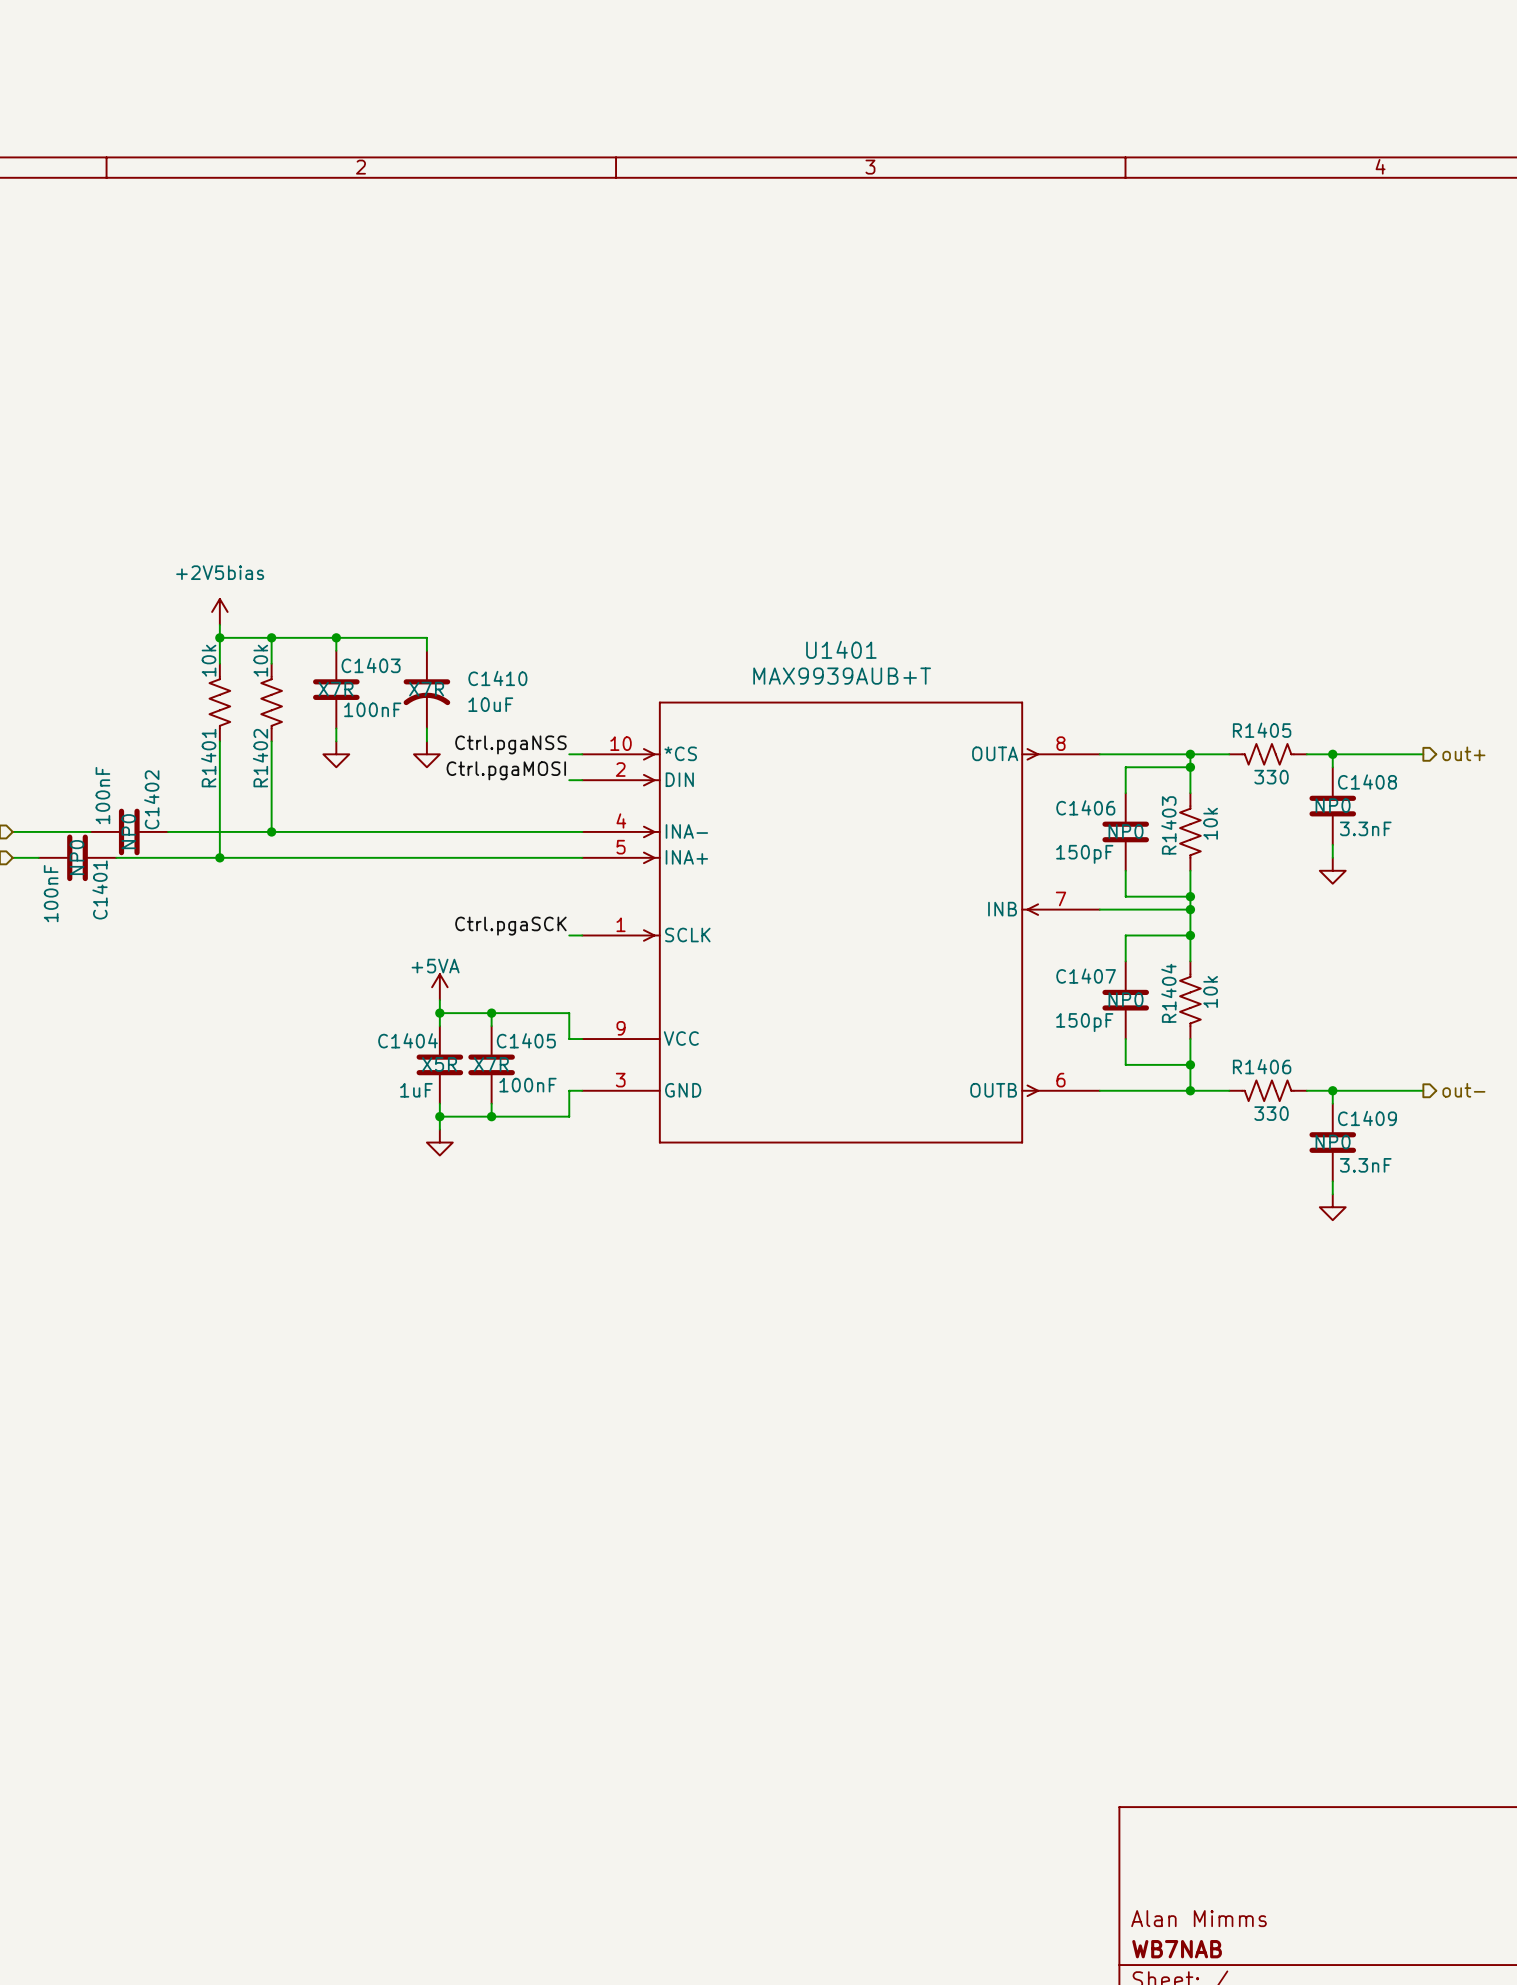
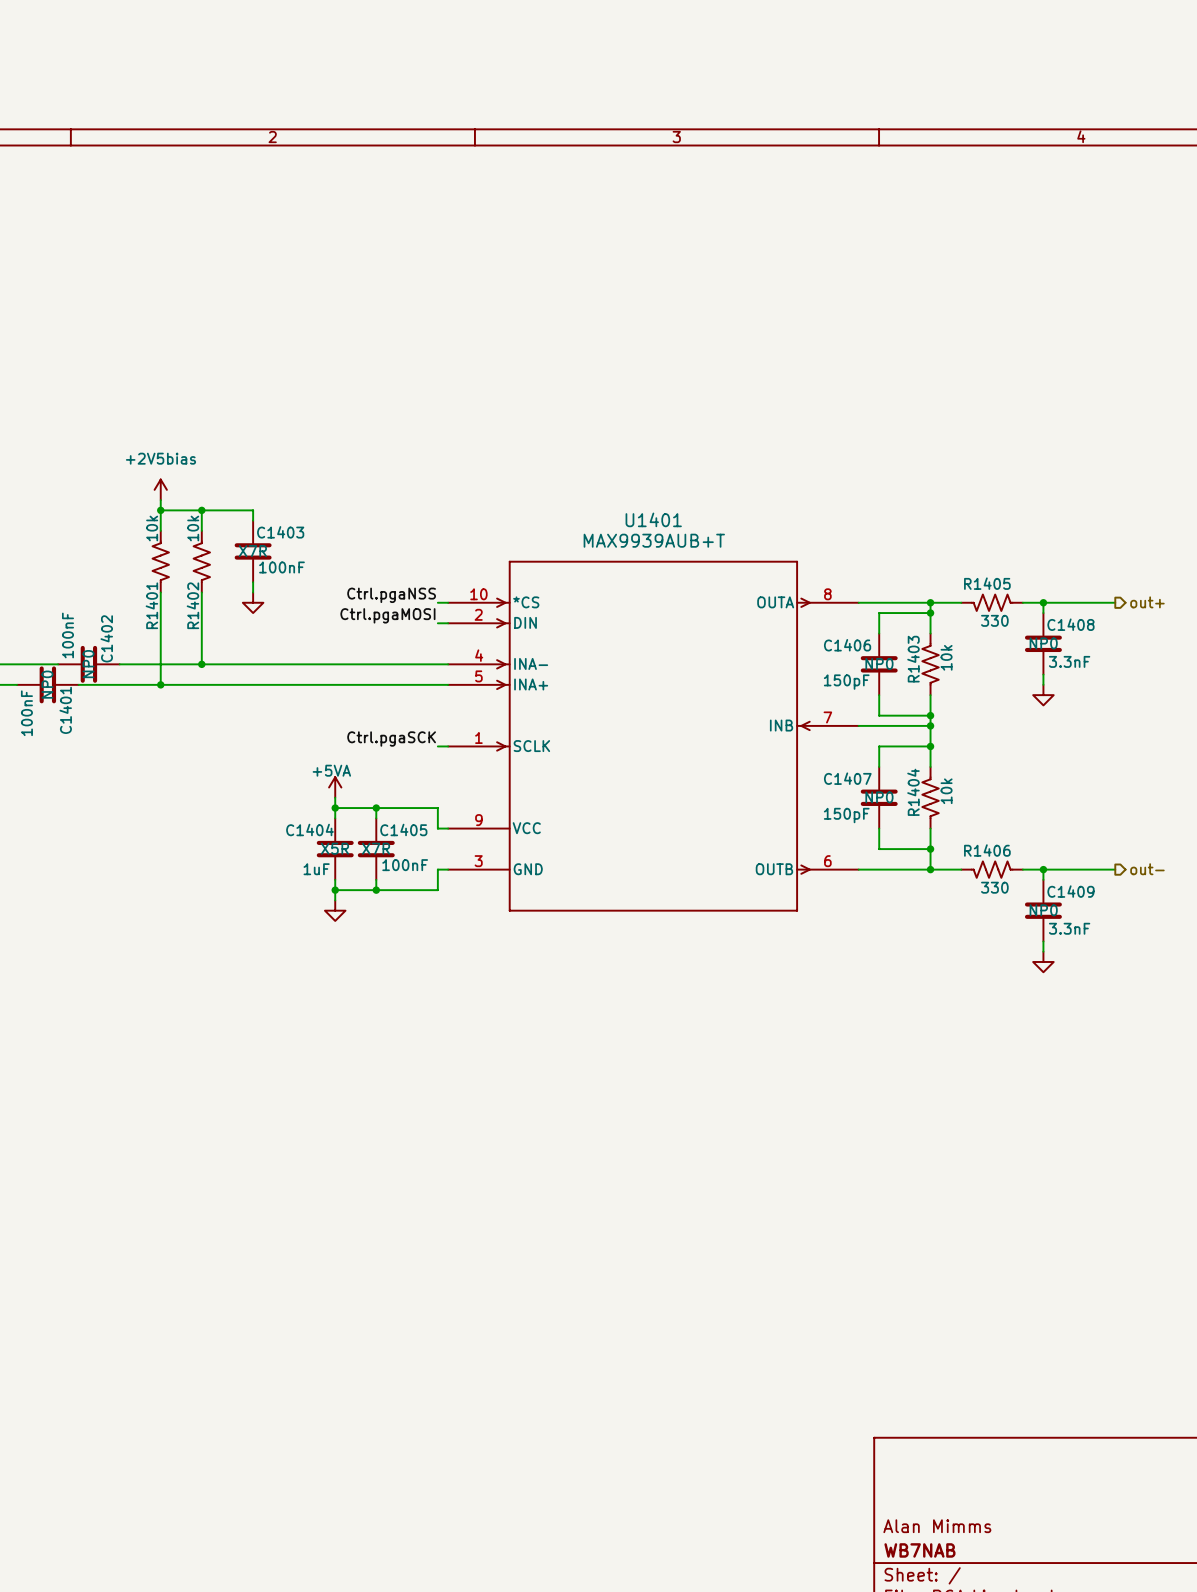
wire: (336, 637) (426, 637) (426, 650) -> none
junction: (336, 637) -> none
C1410: 10uF (426, 689) -> none
wire: (426, 728) (426, 741) -> none
power symbol: (426, 754) -> none

